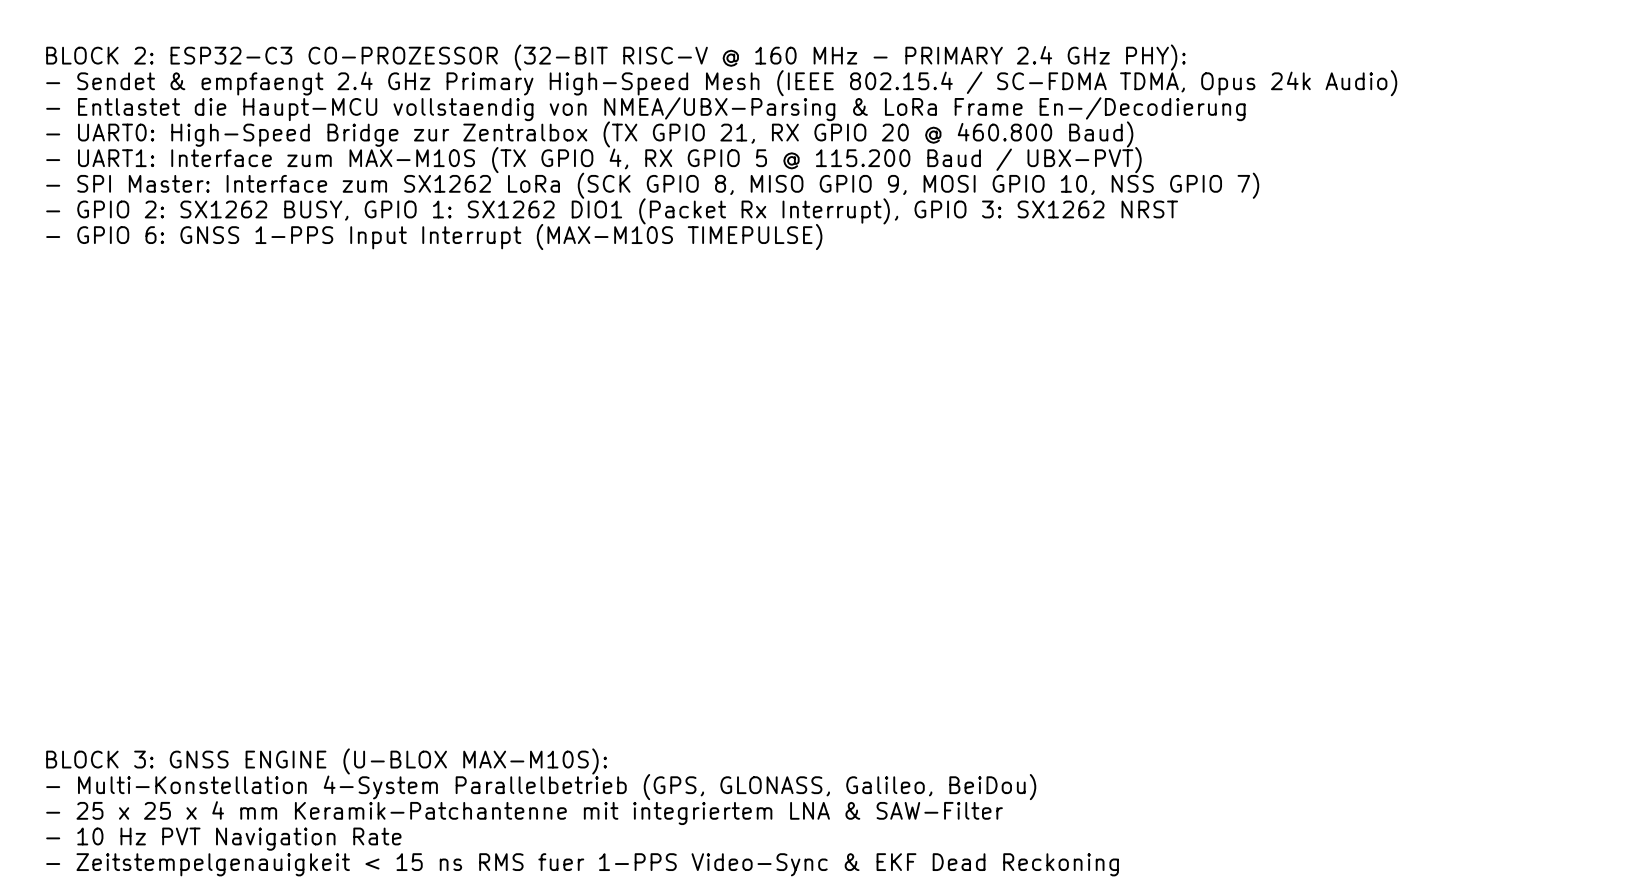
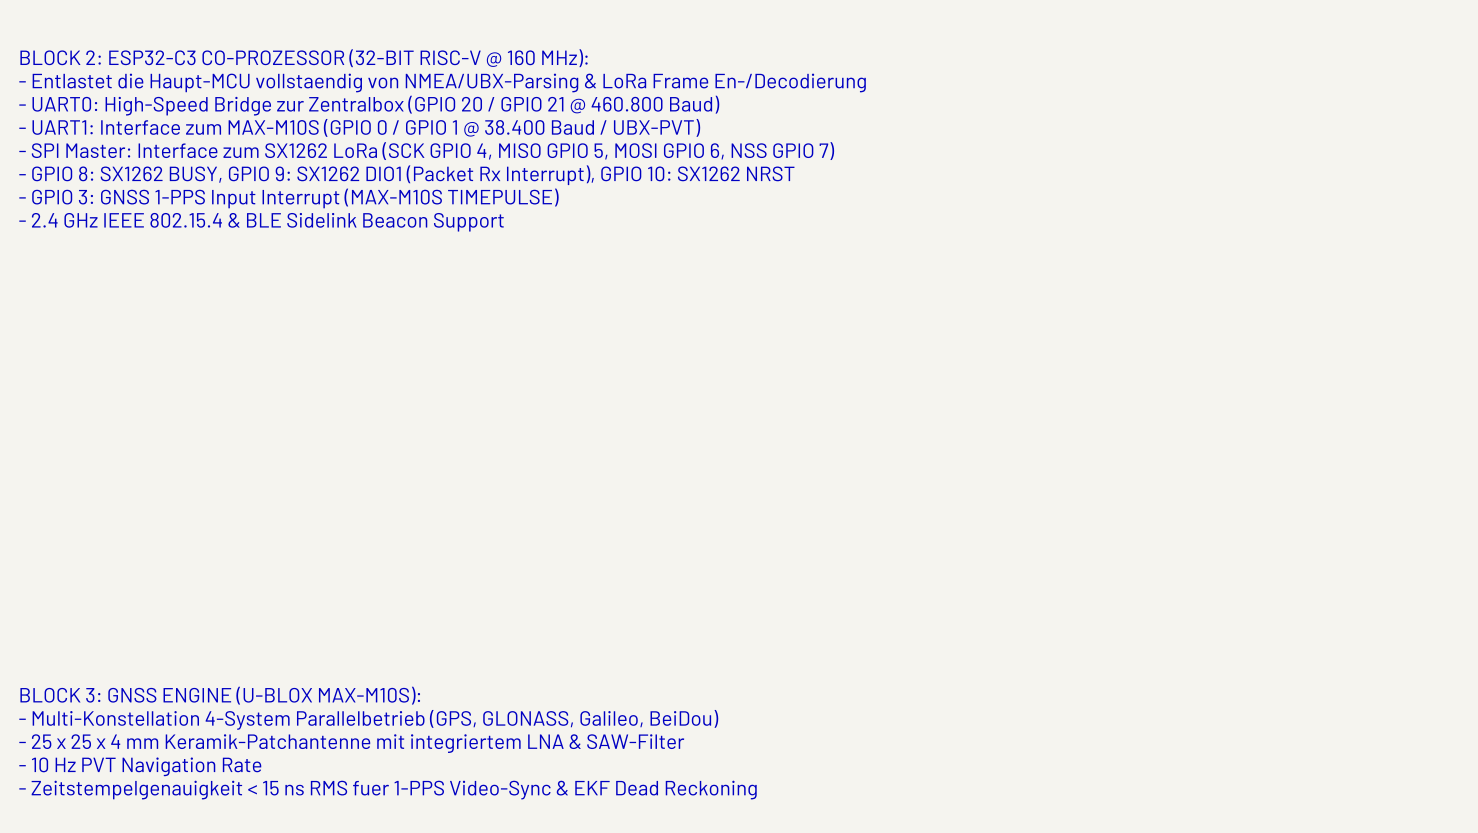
text: BLOCK 2: ESP32-C3 CO-PROZESSOR (32-BIT RISC-V @ 160 MHz - PRIMARY 2.4 GHz PHY): (615, 57) -> BLOCK 2: ESP32-C3 CO-PROZESSOR (32-BIT RISC-V @ 160 MHz): (304, 58)
text: - Sendet & empfaengt 2.4 GHz Primary High-Speed Mesh (IEEE 802.15.4 / SC-FDMA TDMA, Opus 24k Audio) (721, 83) -> - Entlastet die Haupt-MCU vollstaendig von NMEA/UBX-Parsing & LoRa Frame En-/Decodierung (442, 82)
text: - Entlastet die Haupt-MCU vollstaendig von NMEA/UBX-Parsing & LoRa Frame En-/Decodierung (645, 109) -> - UART0: High-Speed Bridge zur Zentralbox (GPIO 20 / GPIO 21 @ 460.800 Baud) (369, 105)
text: - UART0: High-Speed Bridge zur Zentralbox (TX GPIO 21, RX GPIO 20 @ 460.800 Baud) (589, 134) -> - UART1: Interface zum MAX-M10S (GPIO 0 / GPIO 1 @ 38.400 Baud / UBX-PVT) (359, 127)
text: - UART1: Interface zum MAX-M10S (TX GPIO 4, RX GPIO 5 @ 115.200 Baud / UBX-PVT) (593, 160) -> - SPI Master: Interface zum SX1262 LoRa (SCK GPIO 4, MISO GPIO 5, MOSI GPIO 6, NSS GPIO 7) (426, 151)
text: - SPI Master: Interface zum SX1262 LoRa (SCK GPIO 8, MISO GPIO 9, MOSI GPIO 10, NSS GPIO 7) (652, 185) -> - GPIO 8: SX1262 BUSY, GPIO 9: SX1262 DIO1 (Packet Rx Interrupt), GPIO 10: SX1262 NRST (406, 175)
text: - GPIO 2: SX1262 BUSY, GPIO 1: SX1262 DIO1 (Packet Rx Interrupt), GPIO 3: SX1262 NRST (612, 211) -> - GPIO 3: GNSS 1-PPS Input Interrupt (MAX-M10S TIMEPULSE) (288, 198)
text: - GPIO 6: GNSS 1-PPS Input Interrupt (MAX-M10S TIMEPULSE) (434, 237) -> - 2.4 GHz IEEE 802.15.4 & BLE Sidelink Beacon Support (261, 222)

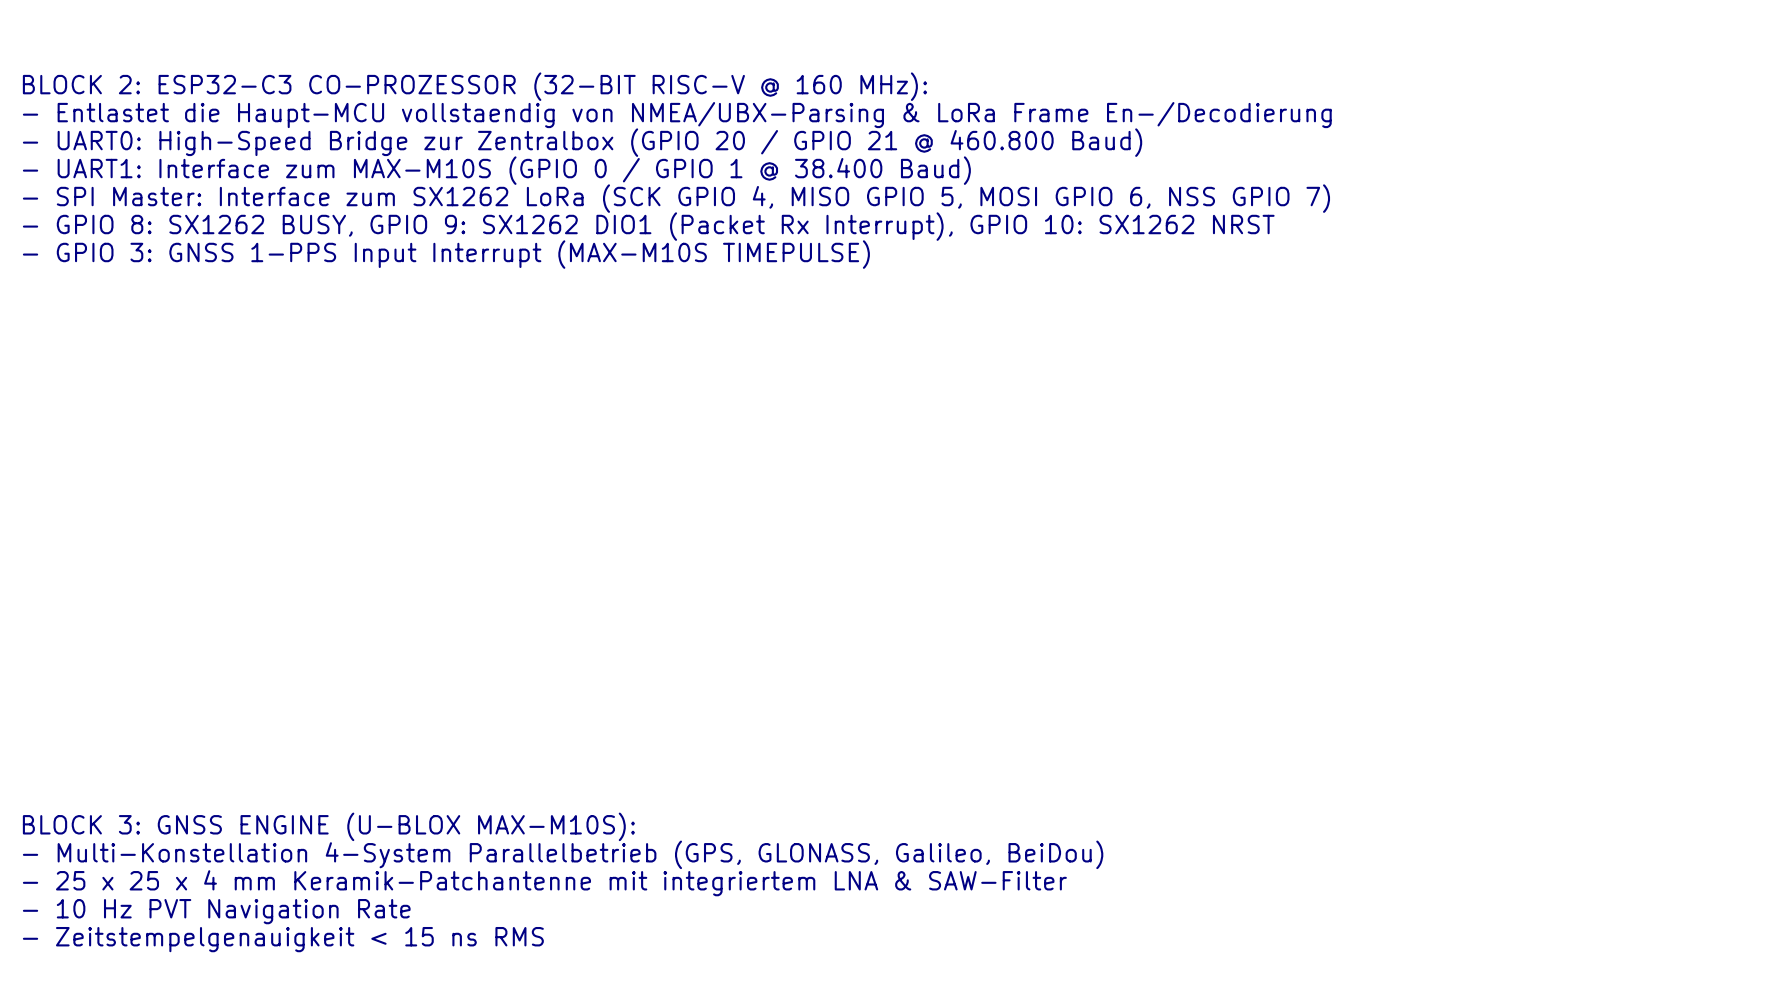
text: BLOCK 2: ESP32-C3 CO-PROZESSOR (32-BIT RISC-V @ 160 MHz): (304, 58) -> none
text: - Entlastet die Haupt-MCU vollstaendig von NMEA/UBX-Parsing & LoRa Frame En-/Decodierung (442, 82) -> BLOCK 2: ESP32-C3 CO-PROZESSOR (32-BIT RISC-V @ 160 MHz): (474, 86)
text: - UART0: High-Speed Bridge zur Zentralbox (GPIO 20 / GPIO 21 @ 460.800 Baud) (369, 105) -> - Entlastet die Haupt-MCU vollstaendig von NMEA/UBX-Parsing & LoRa Frame En-/Decodierung (677, 115)
text: - UART1: Interface zum MAX-M10S (GPIO 0 / GPIO 1 @ 38.400 Baud / UBX-PVT) (359, 127) -> - UART0: High-Speed Bridge zur Zentralbox (GPIO 20 / GPIO 21 @ 460.800 Baud) (582, 142)
text: - SPI Master: Interface zum SX1262 LoRa (SCK GPIO 4, MISO GPIO 5, MOSI GPIO 6, NSS GPIO 7) (426, 151) -> - UART1: Interface zum MAX-M10S (GPIO 0 / GPIO 1 @ 38.400 Baud) (496, 170)
text: - GPIO 8: SX1262 BUSY, GPIO 9: SX1262 DIO1 (Packet Rx Interrupt), GPIO 10: SX1262 NRST (406, 175) -> - SPI Master: Interface zum SX1262 LoRa (SCK GPIO 4, MISO GPIO 5, MOSI GPIO 6, NSS GPIO 7) (676, 198)
text: - GPIO 3: GNSS 1-PPS Input Interrupt (MAX-M10S TIMEPULSE) (288, 198) -> - GPIO 8: SX1262 BUSY, GPIO 9: SX1262 DIO1 (Packet Rx Interrupt), GPIO 10: SX1262 NRST (648, 226)
text: - 2.4 GHz IEEE 802.15.4 & BLE Sidelink Beacon Support (261, 222) -> - GPIO 3: GNSS 1-PPS Input Interrupt (MAX-M10S TIMEPULSE) (446, 254)
text: - Zeitstempelgenauigkeit < 15 ns RMS fuer 1-PPS Video-Sync & EKF Dead Reckoning (387, 790) -> - Zeitstempelgenauigkeit < 15 ns RMS (283, 939)

